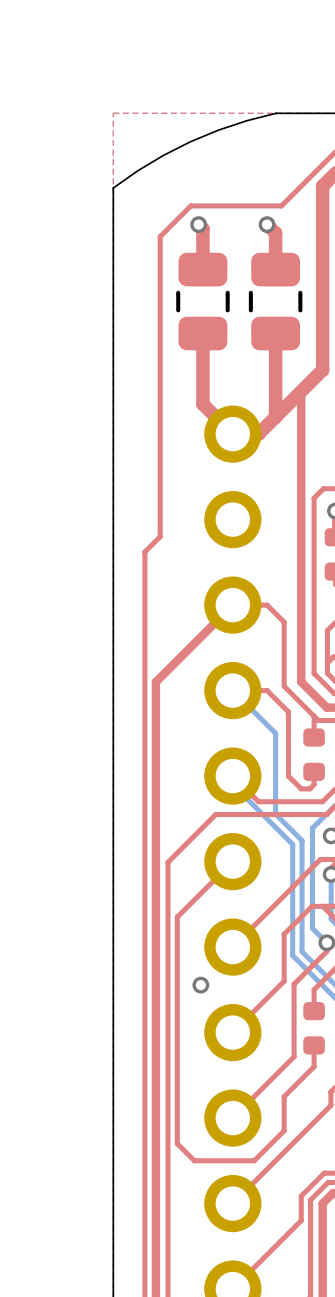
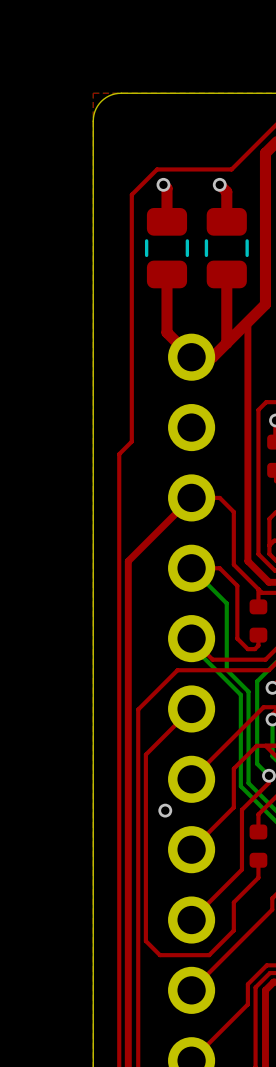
board edge: (276, 113) (246, 120) (190, 141) (163, 155) (113, 187) -> (227, 93) (121, 93) (109, 95) (99, 103) (93, 114) (93, 154)

